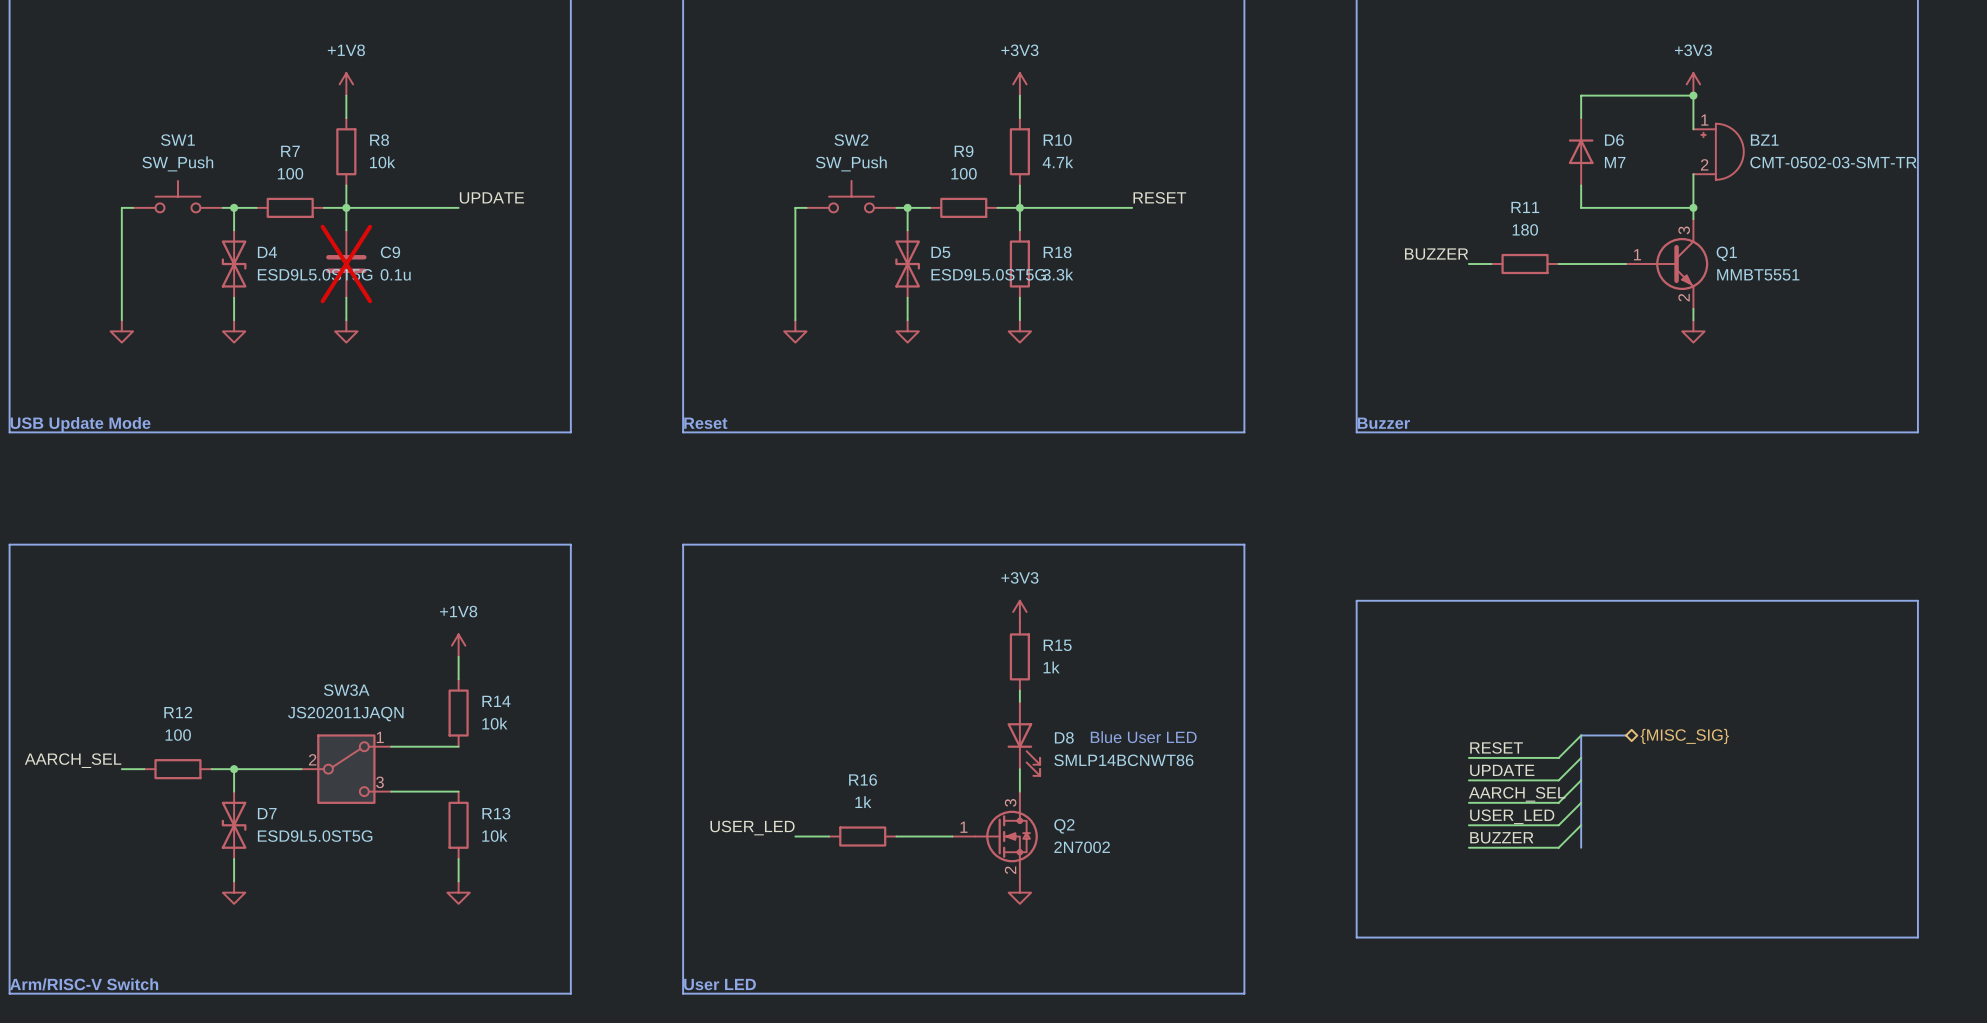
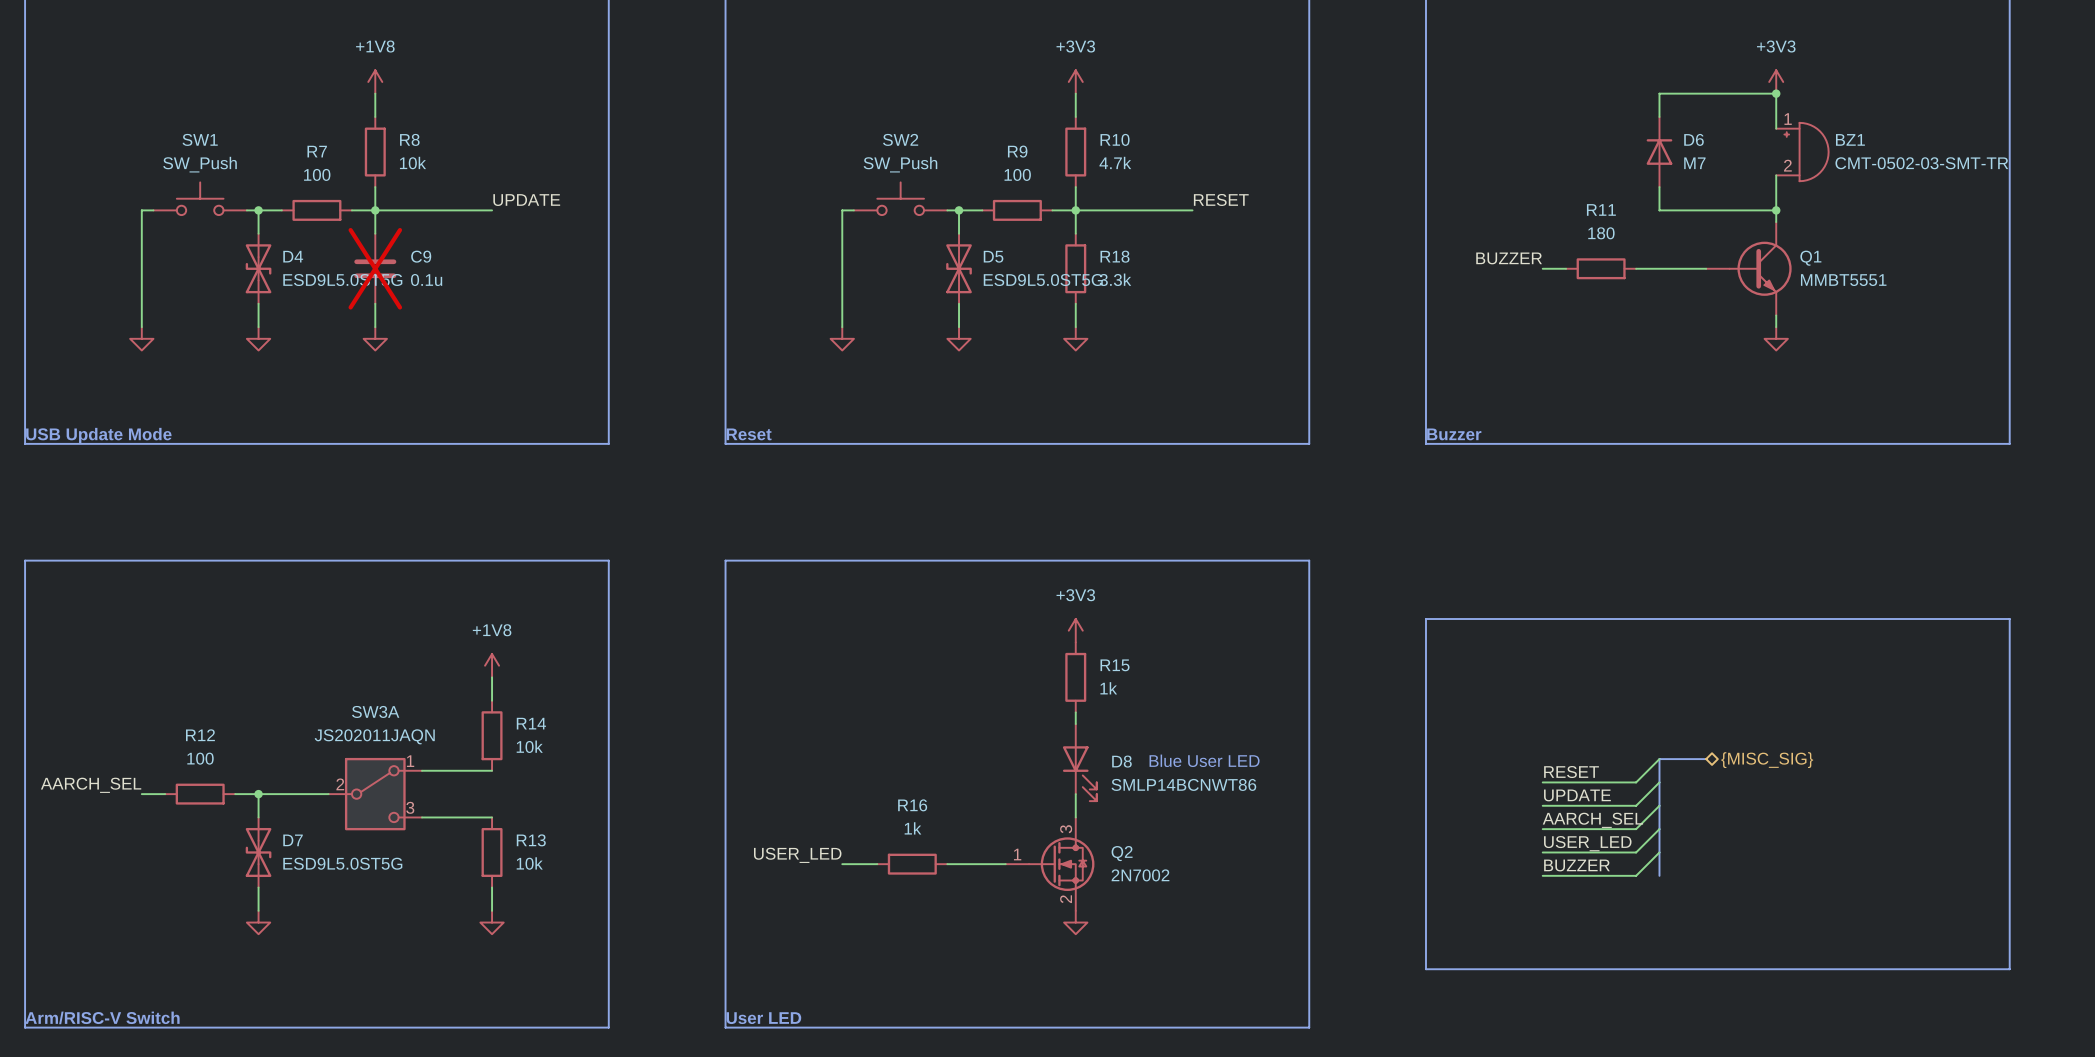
Q1 pin number: 3 (1684, 230) -> none
Q1 pin number: 1 (1637, 254) -> none
Q1 pin number: 2 (1684, 297) -> none

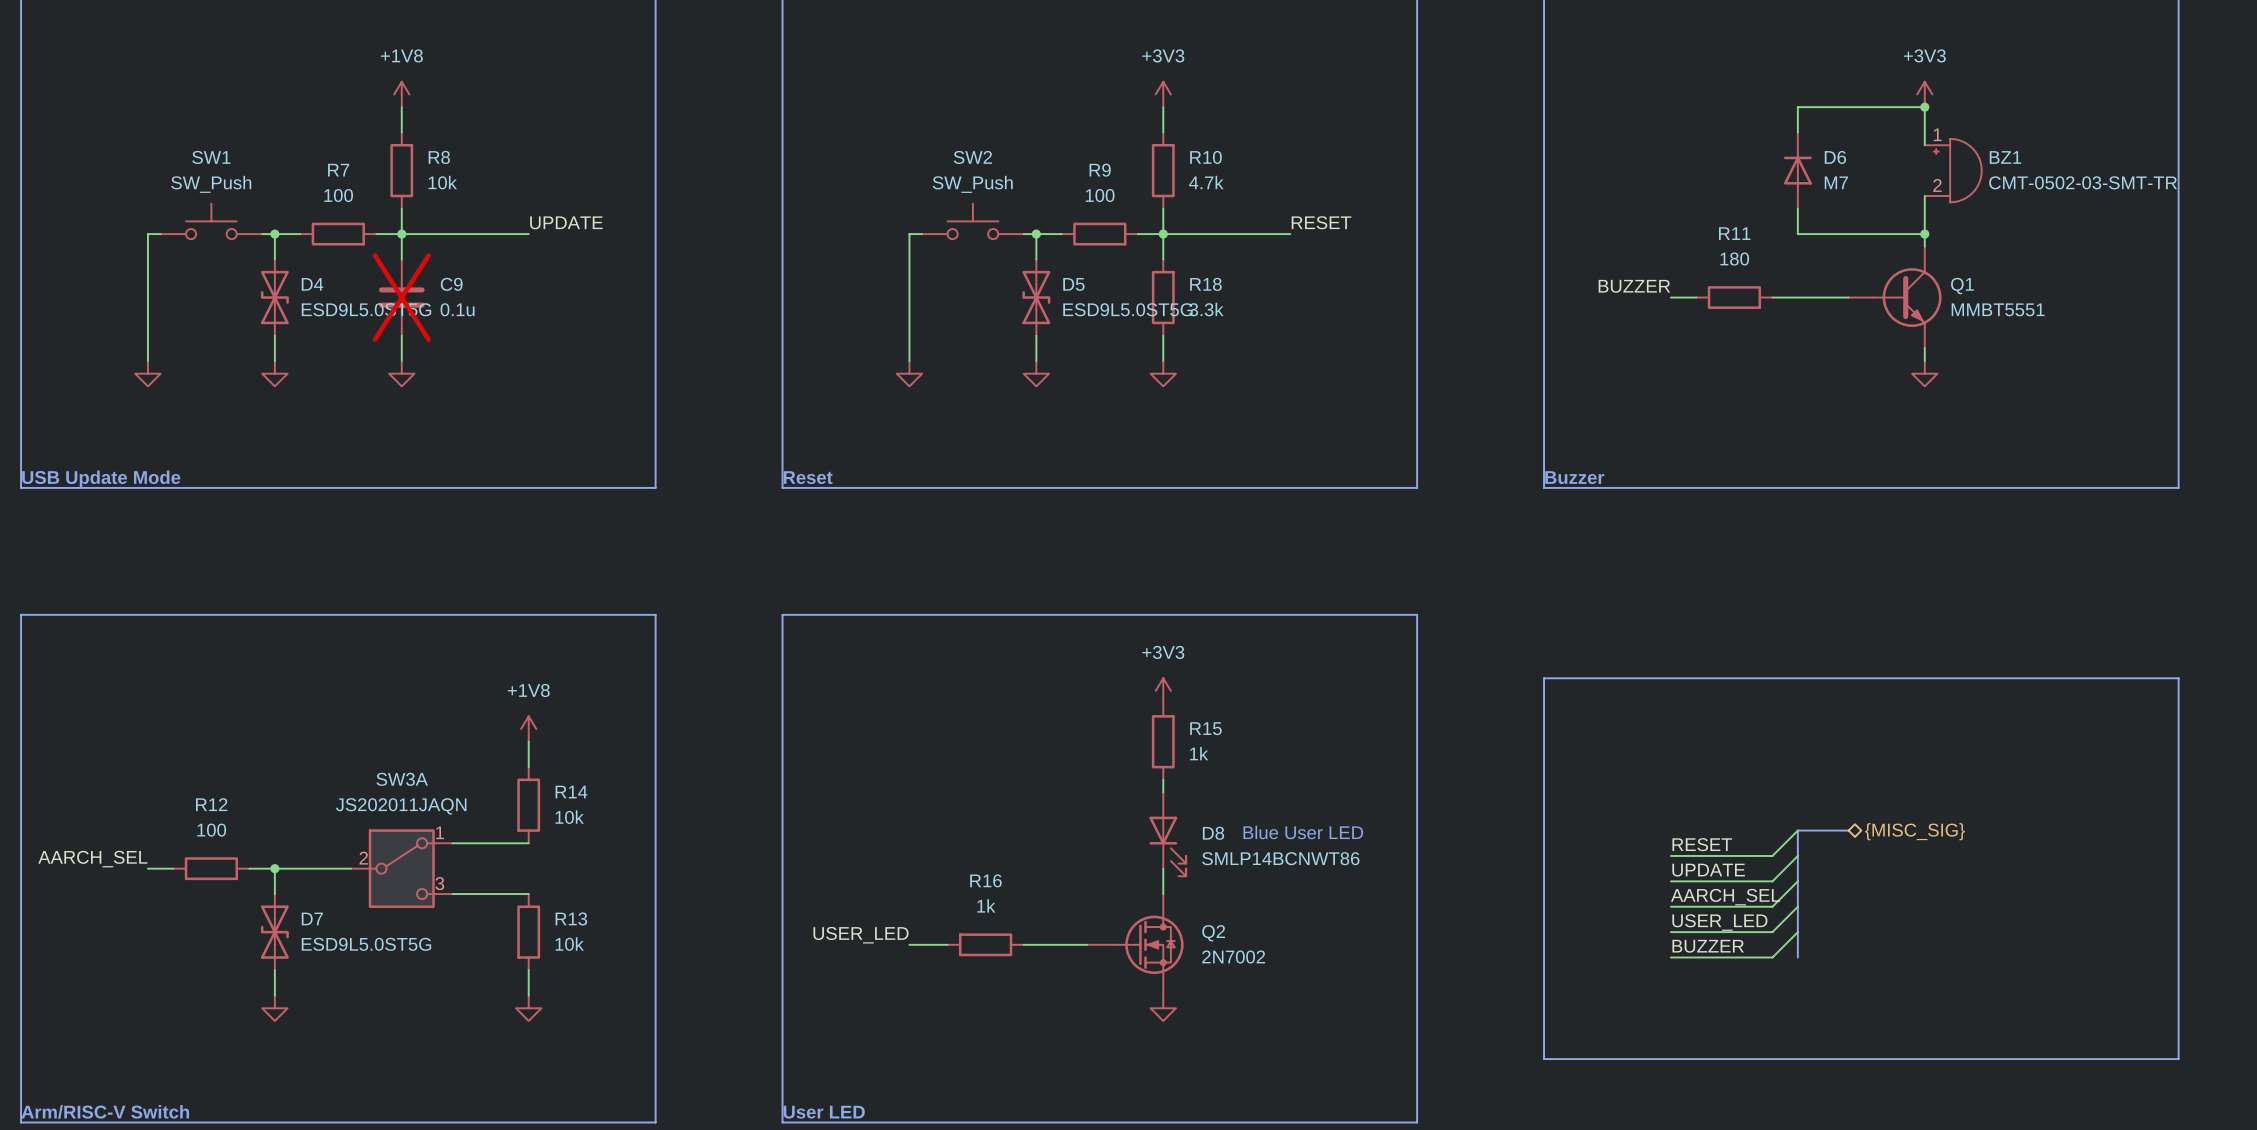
Q2 pin number: 3 (1066, 829) -> none
Q2 pin number: 1 (1017, 854) -> none
Q2 pin number: 2 (1066, 899) -> none

